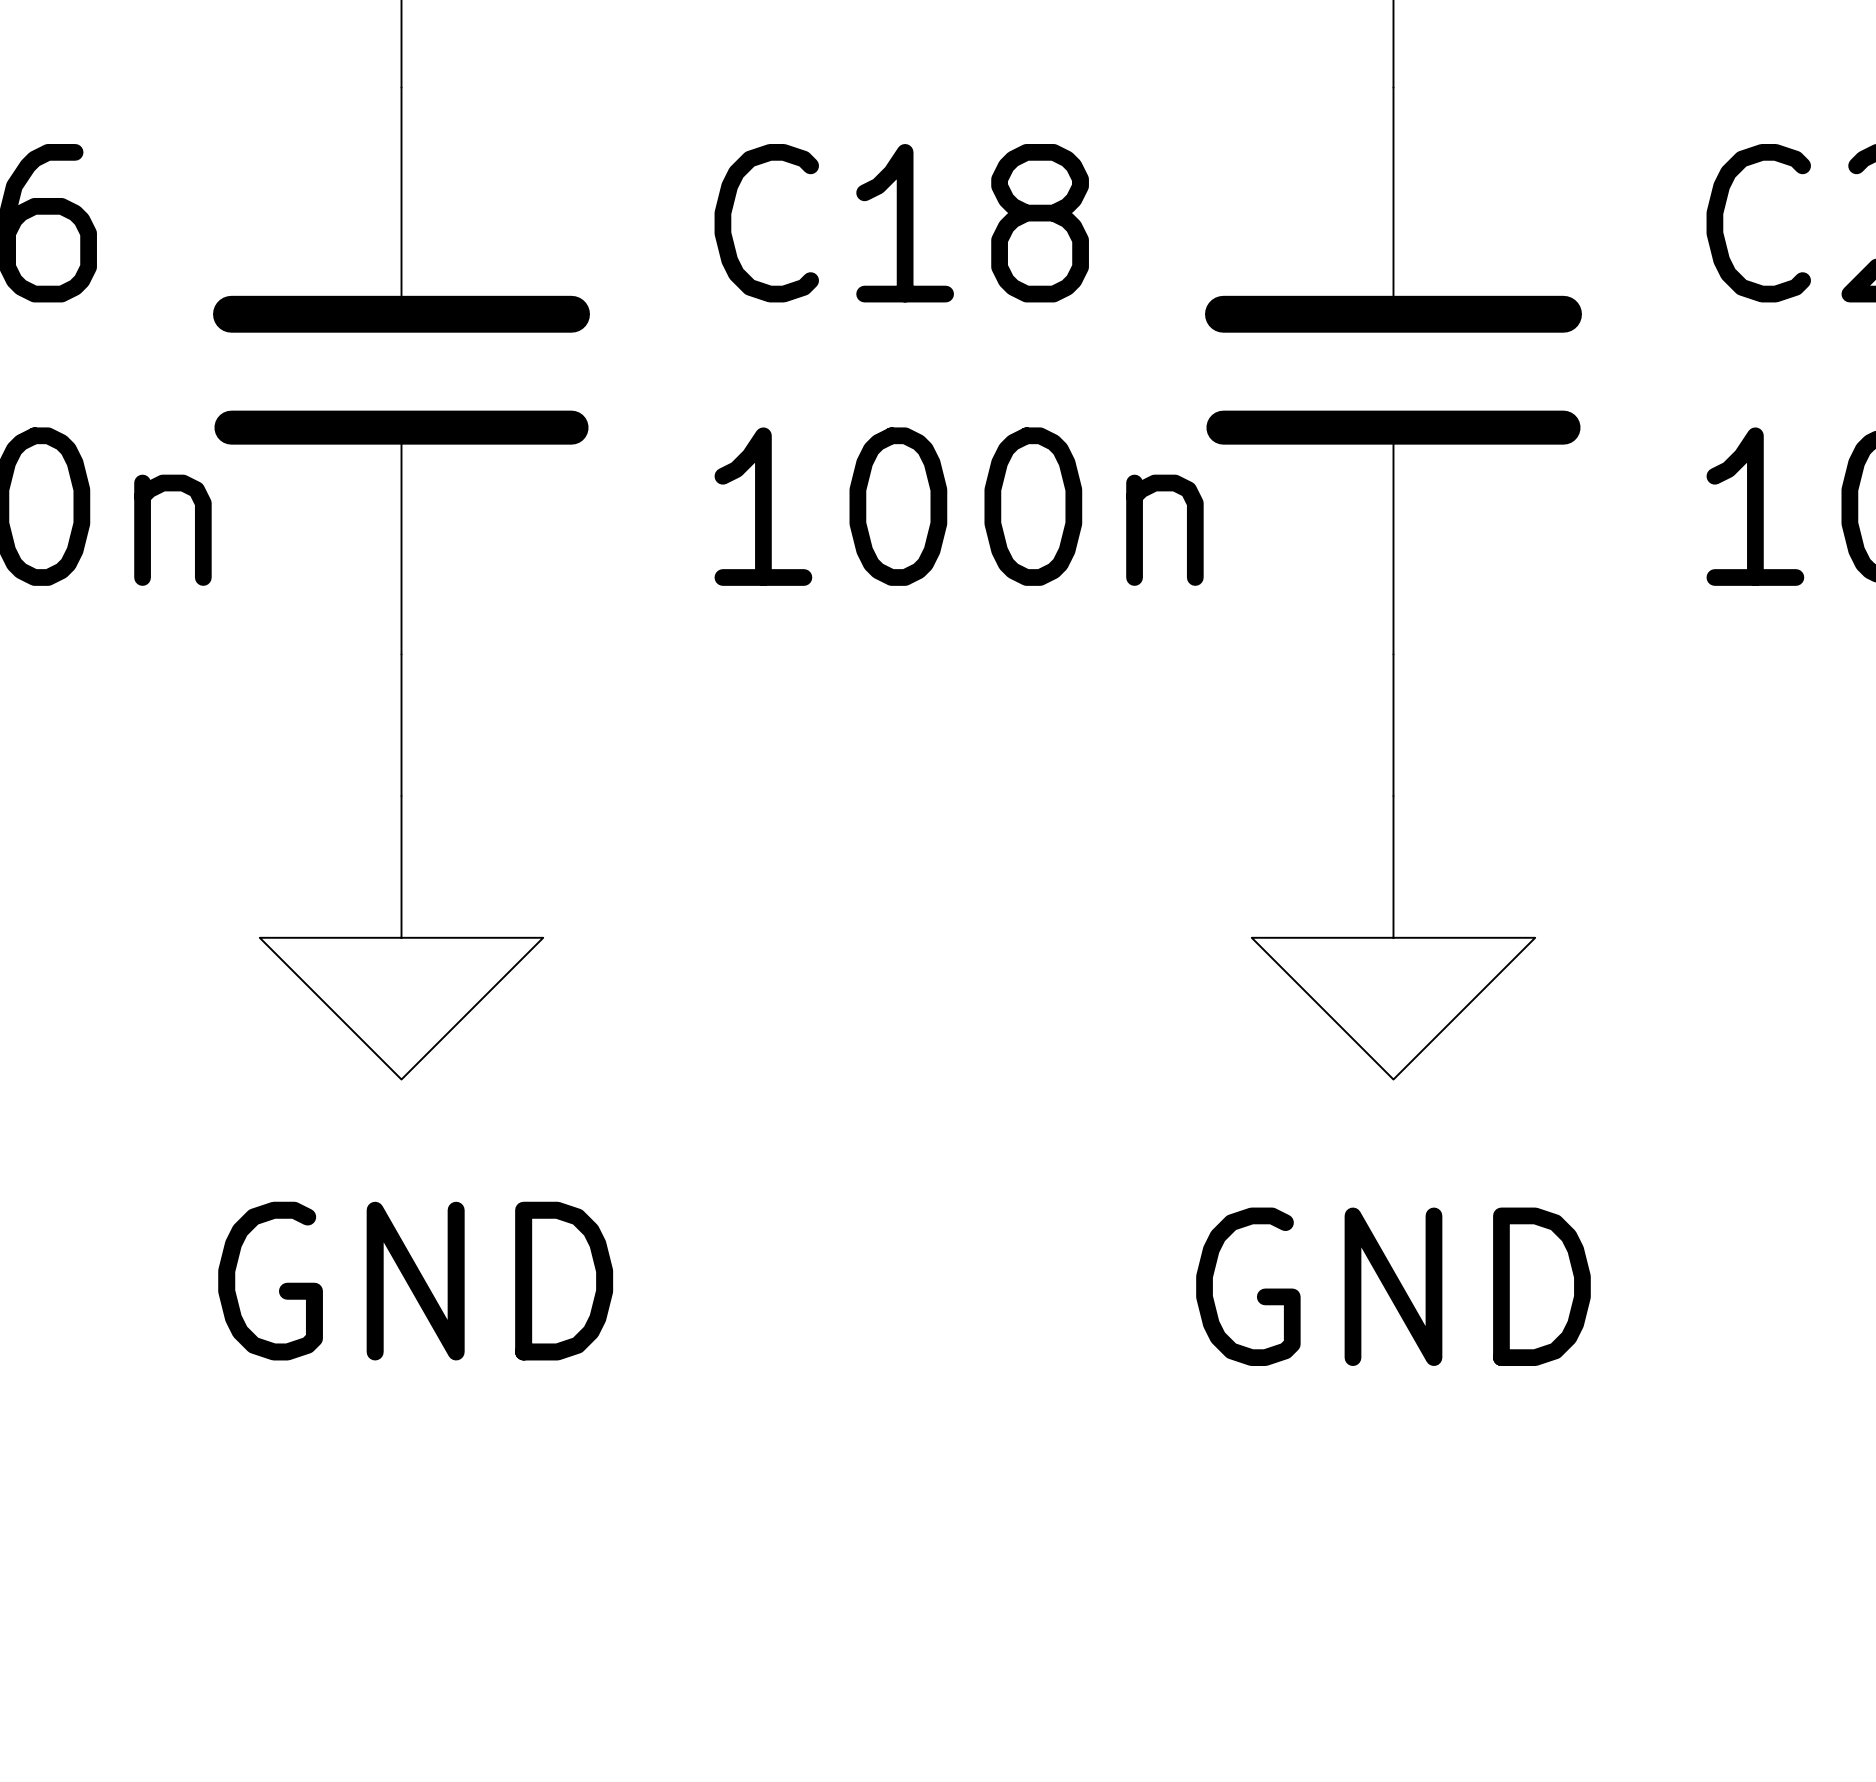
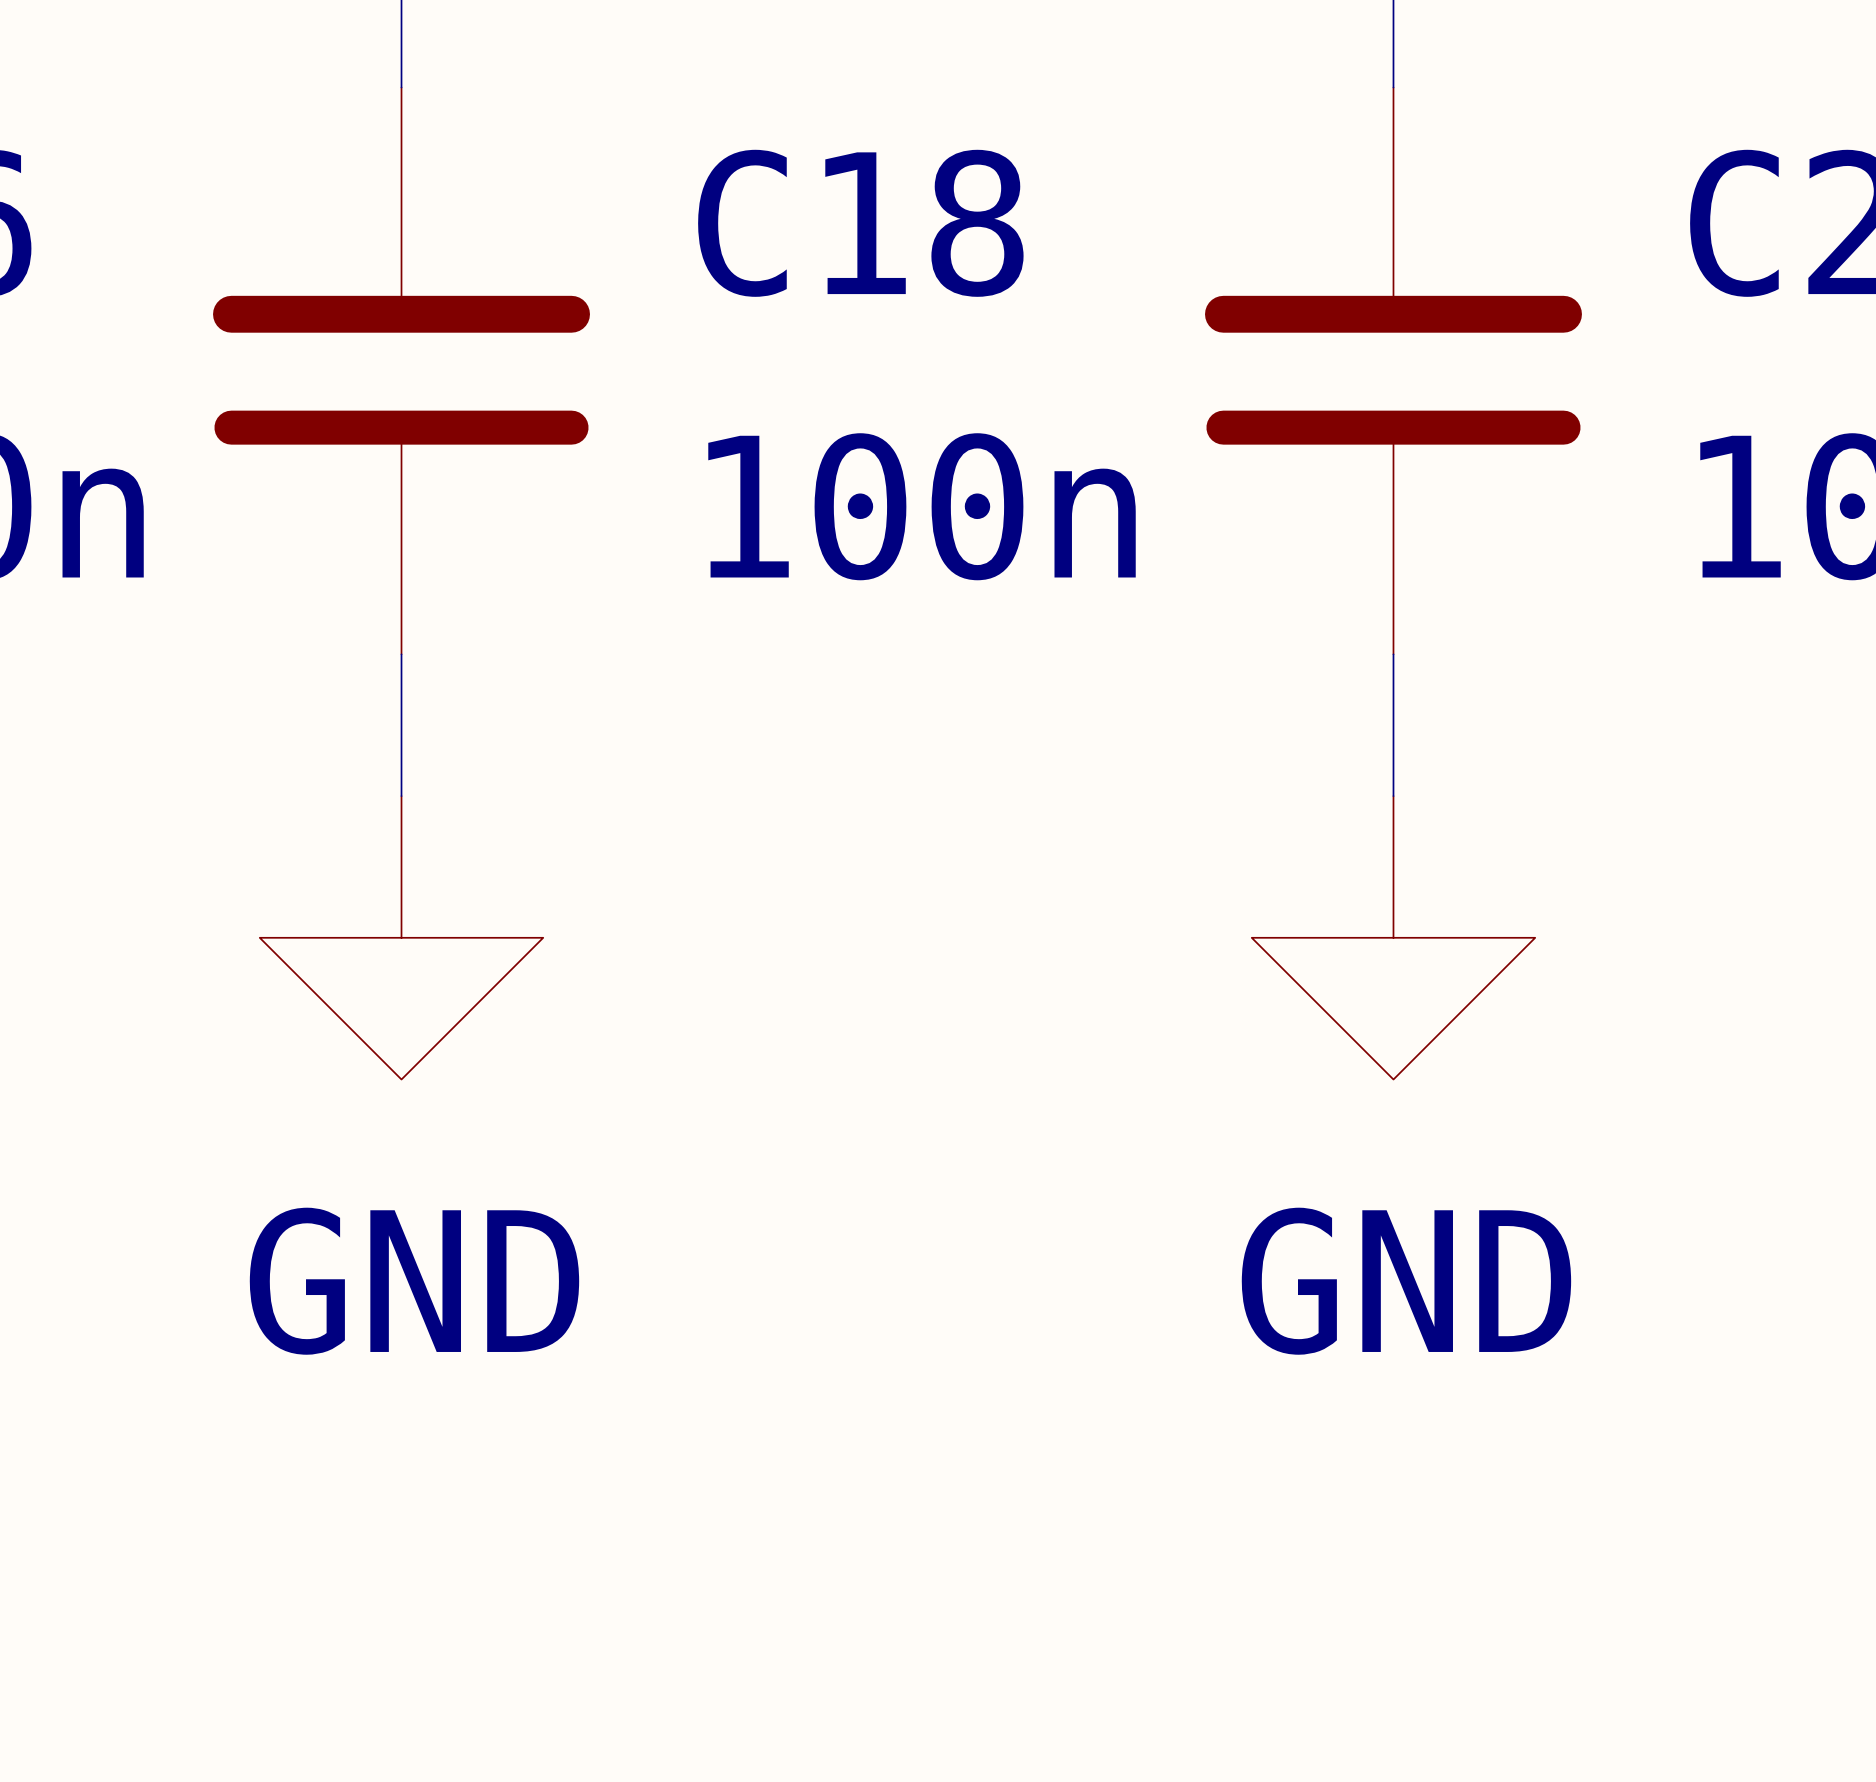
power symbol text position: GND (1393, 1286) -> GND (1406, 1281)

